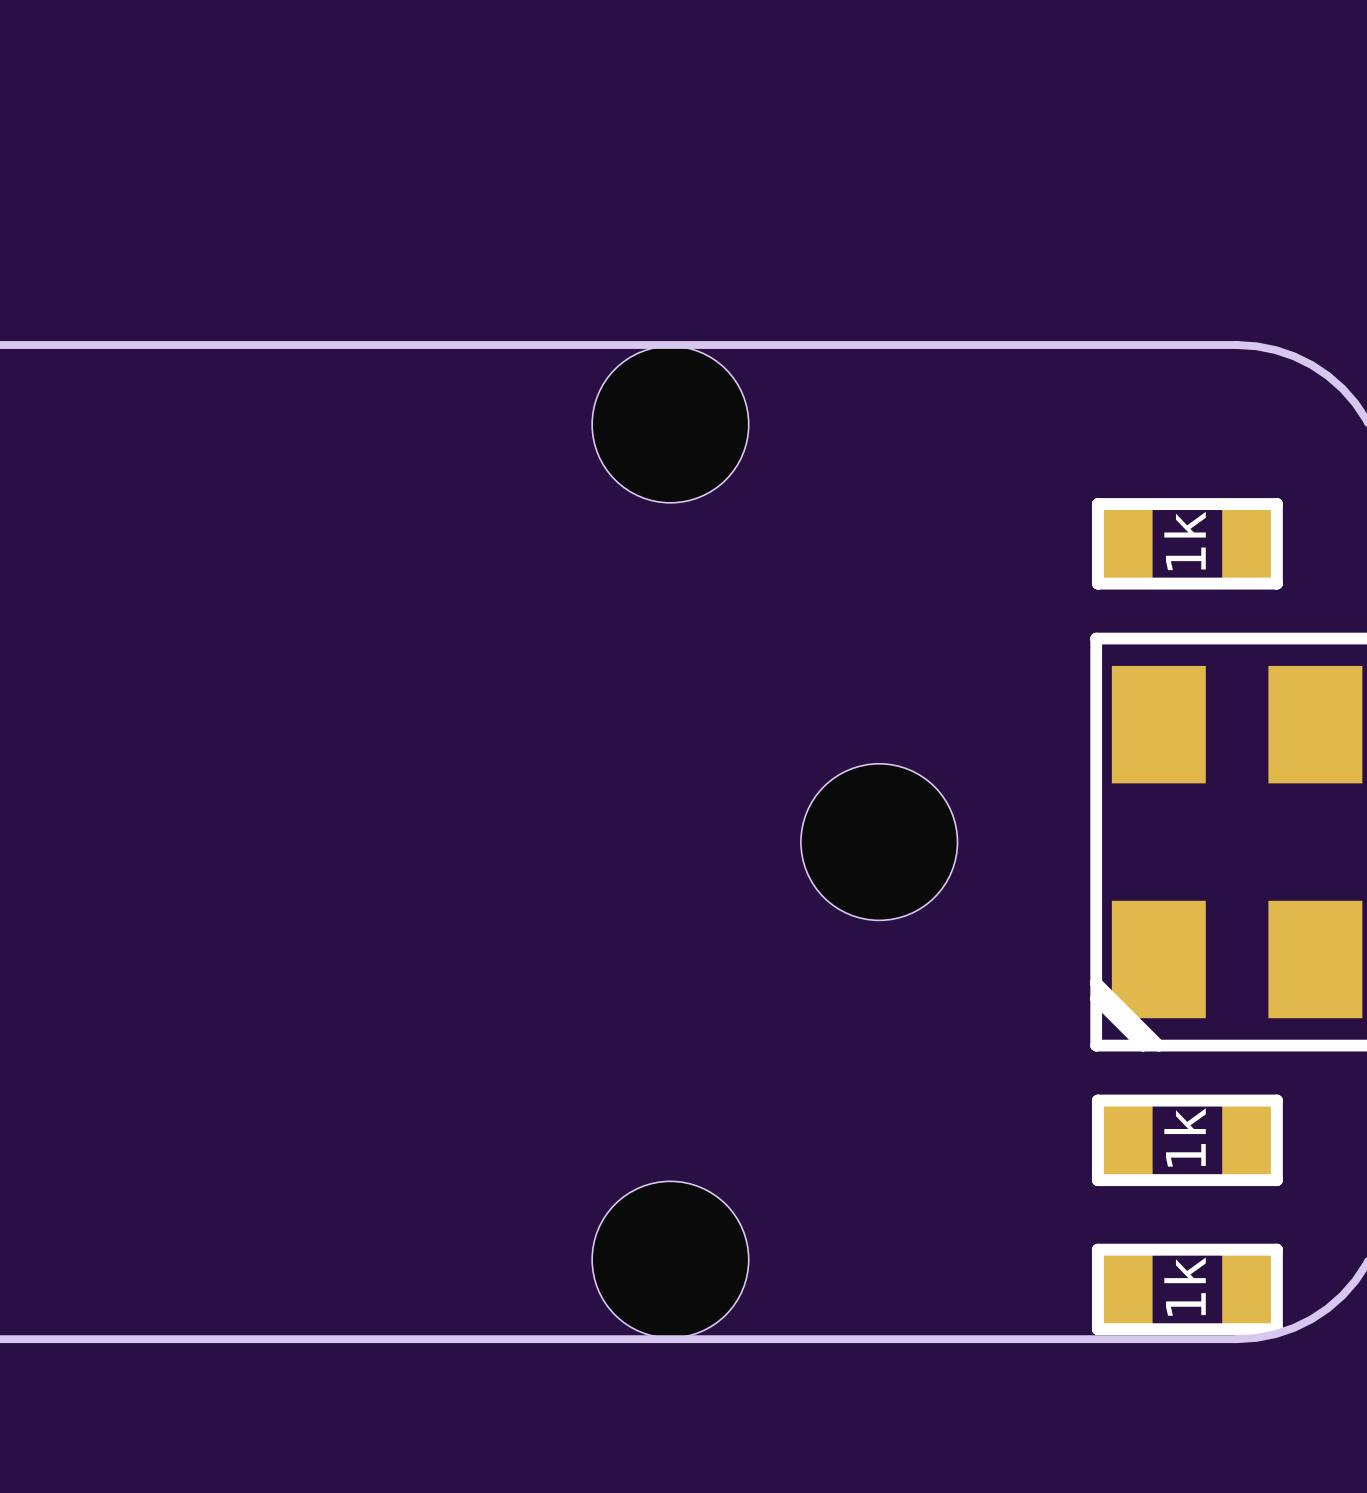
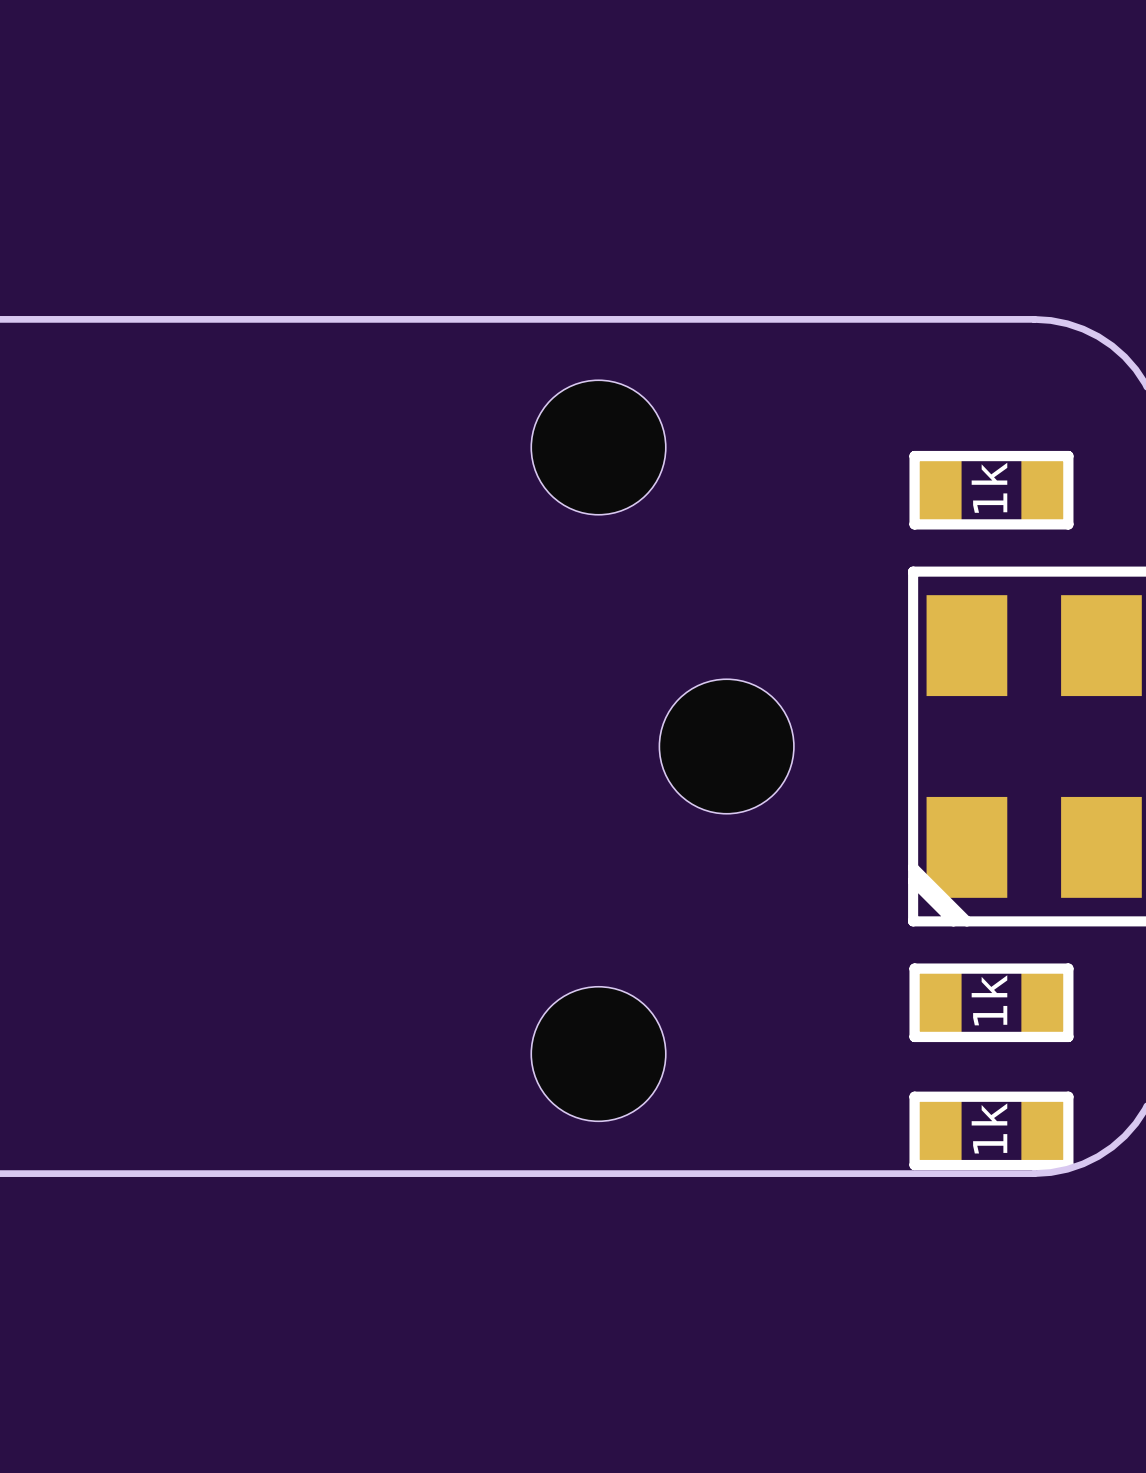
part position: (670, 424) -> (598, 447)
part position: (670, 1259) -> (598, 1054)

